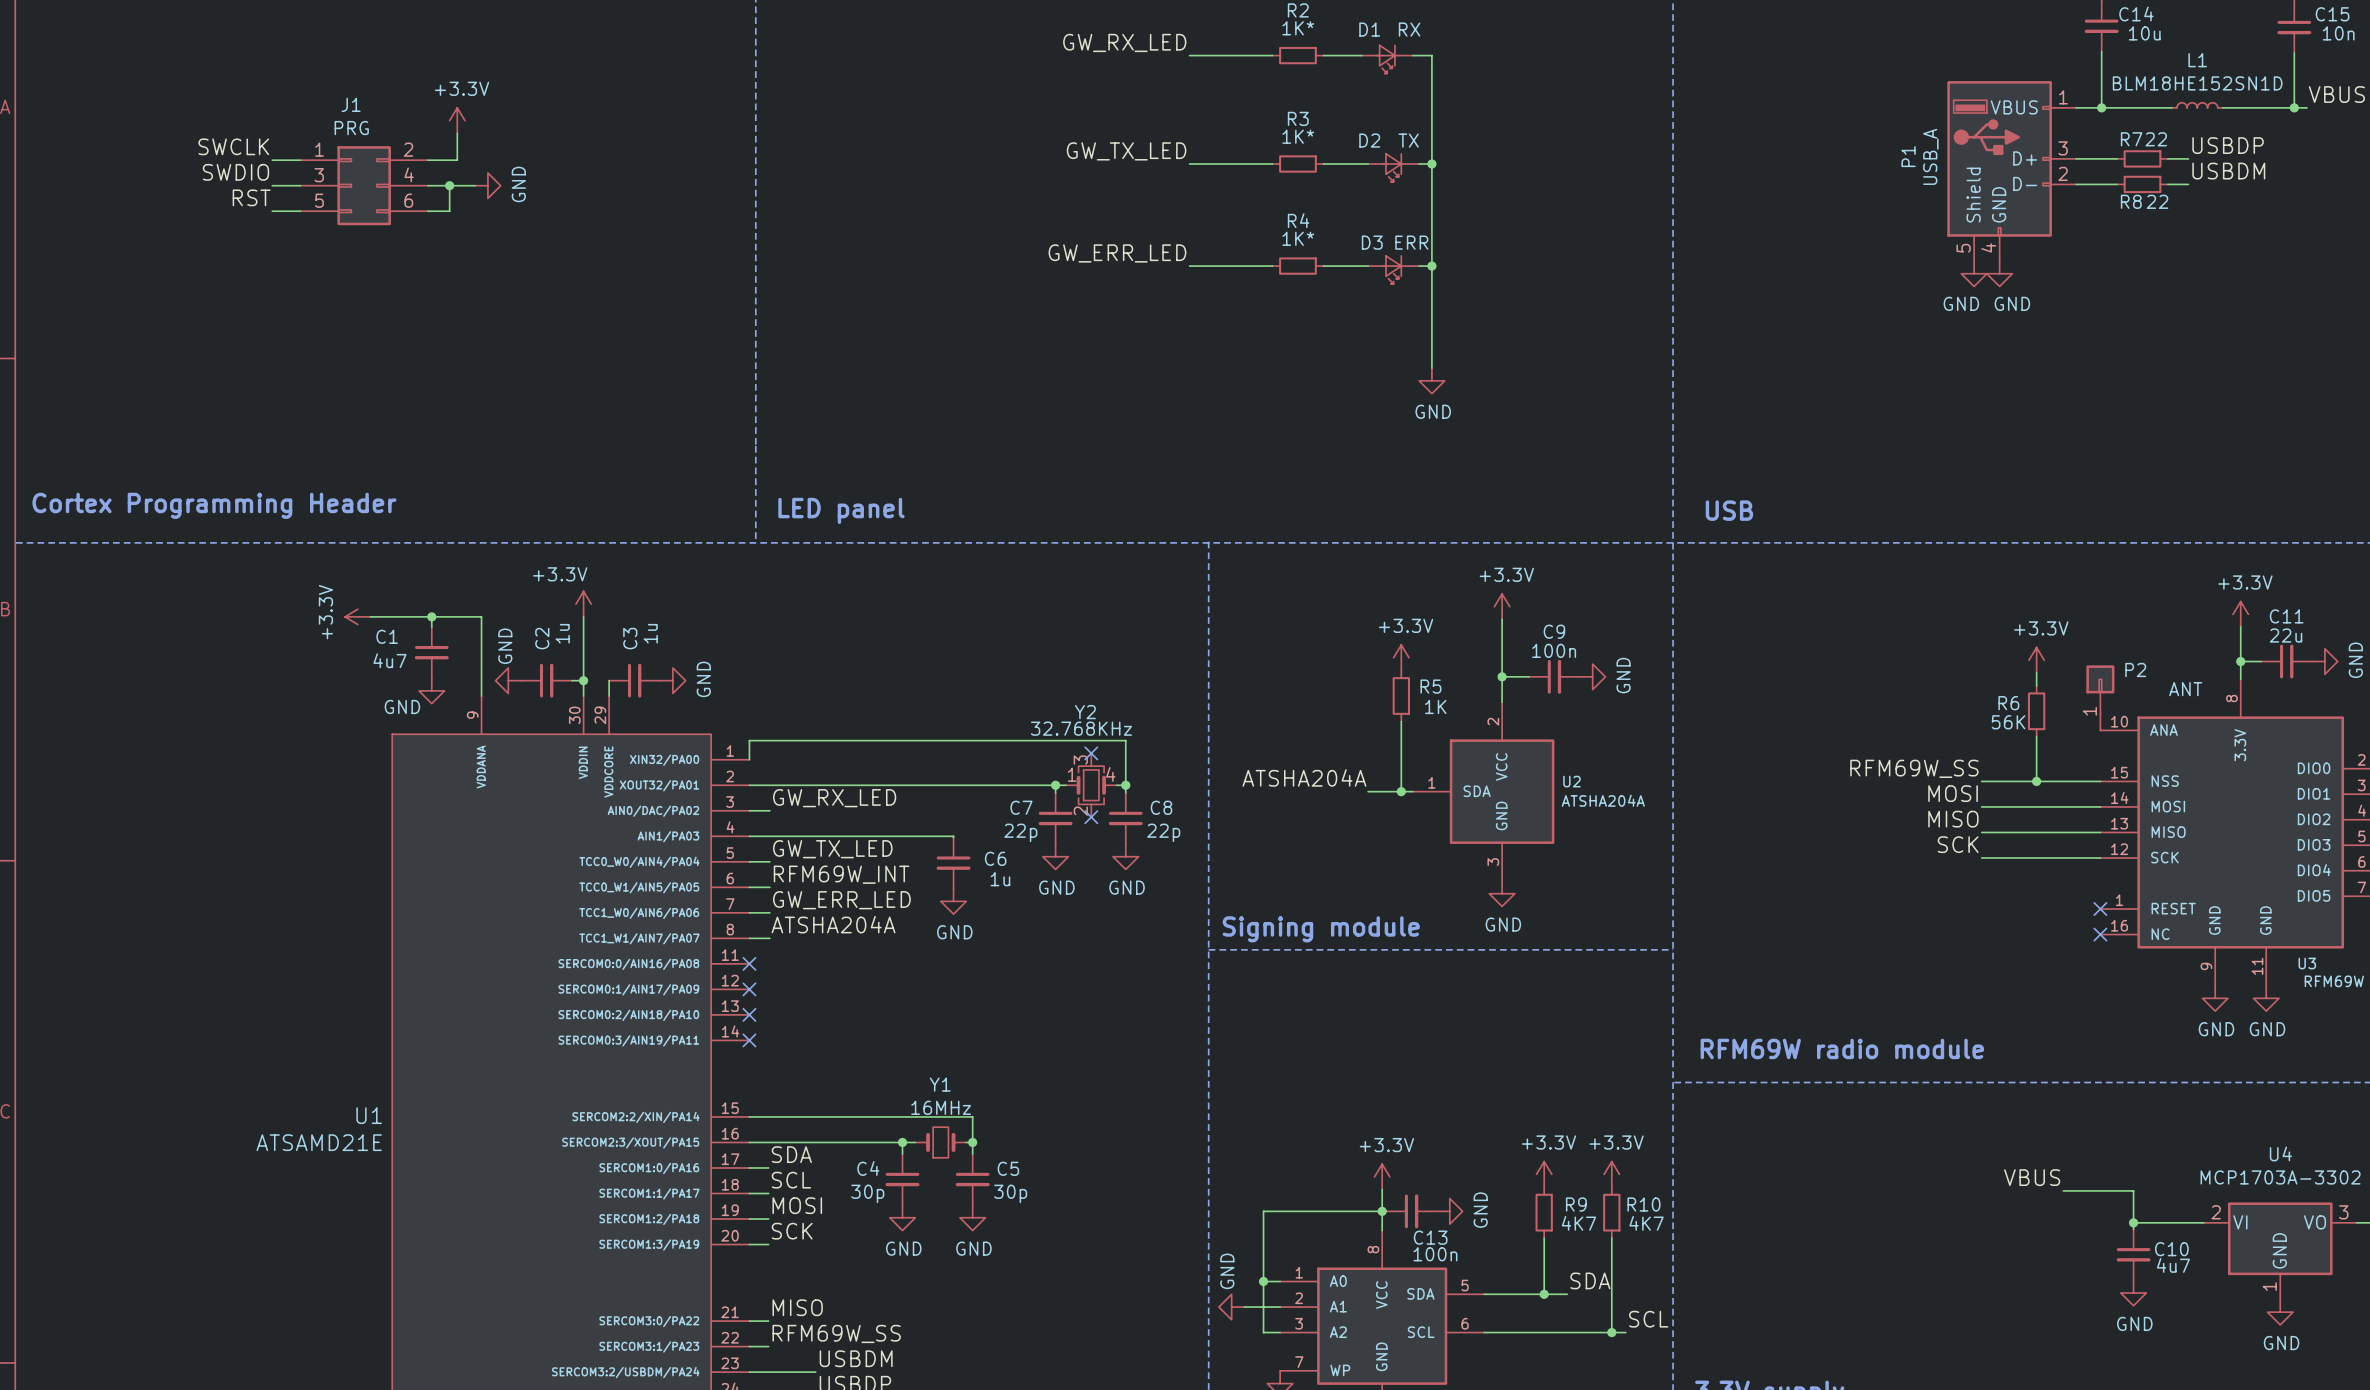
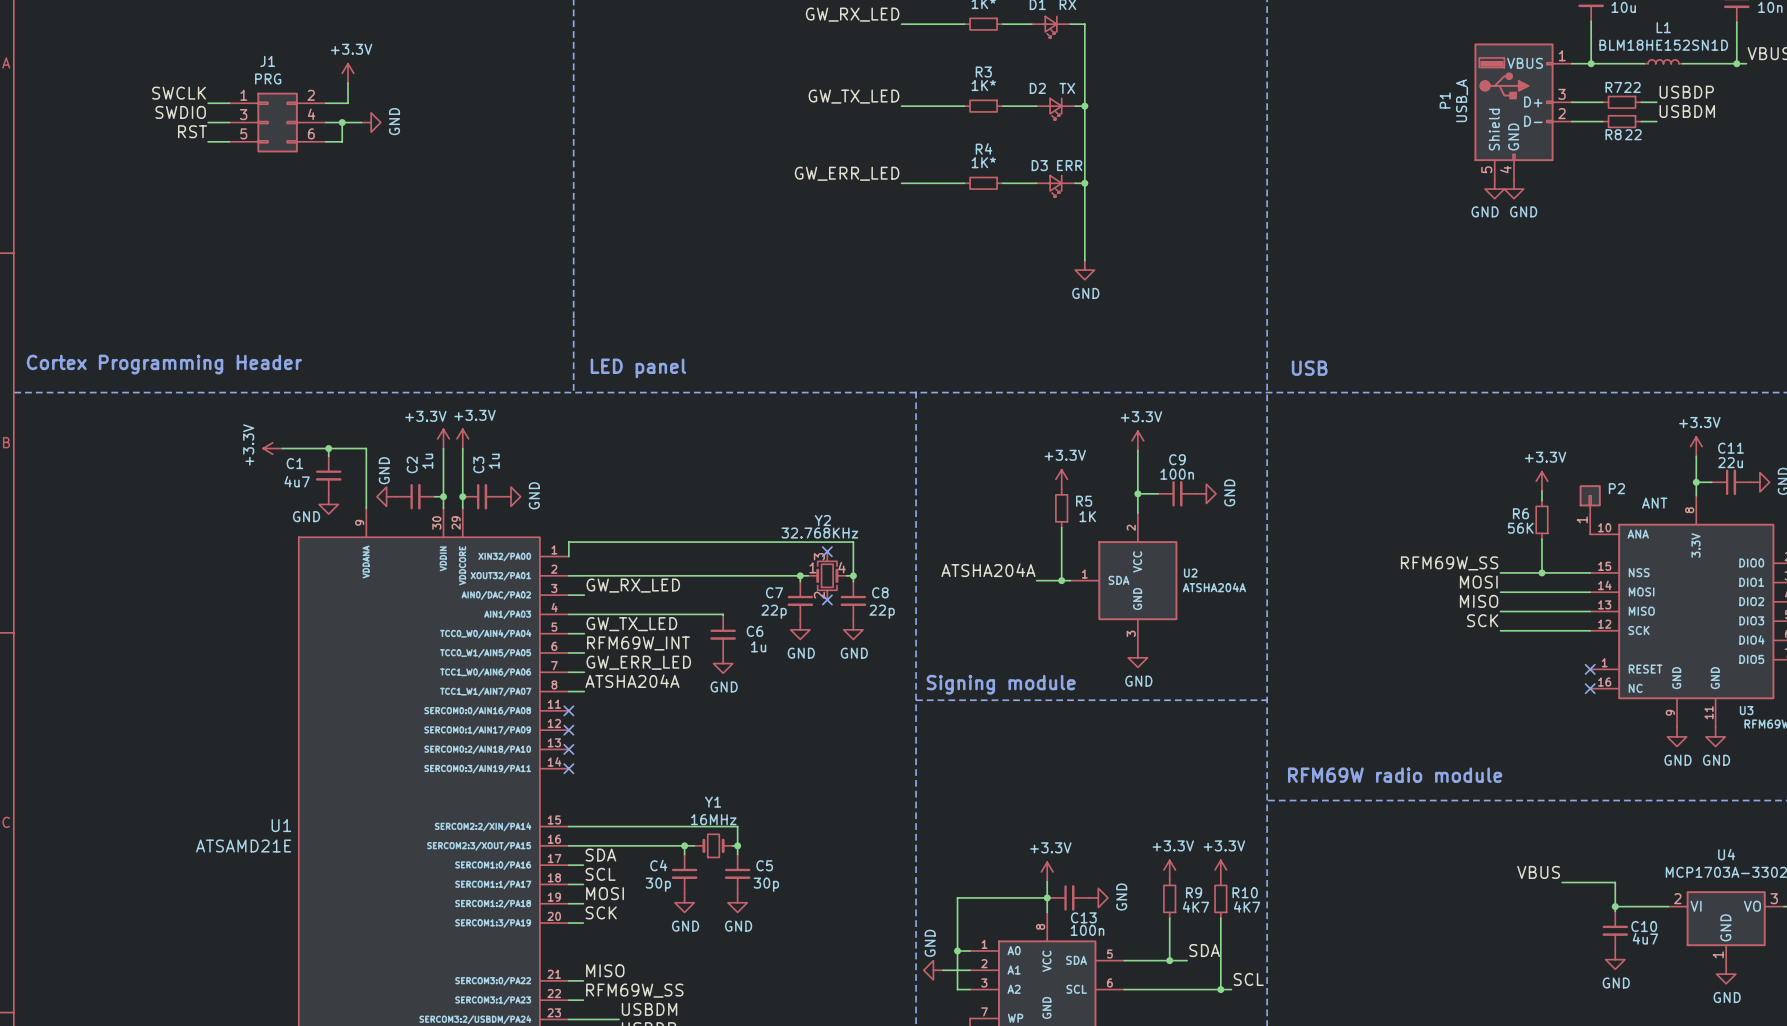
power symbol: none -> +3.3V (462, 438)
wire: none -> (462, 448) (462, 496)
junction: none -> (462, 496)

